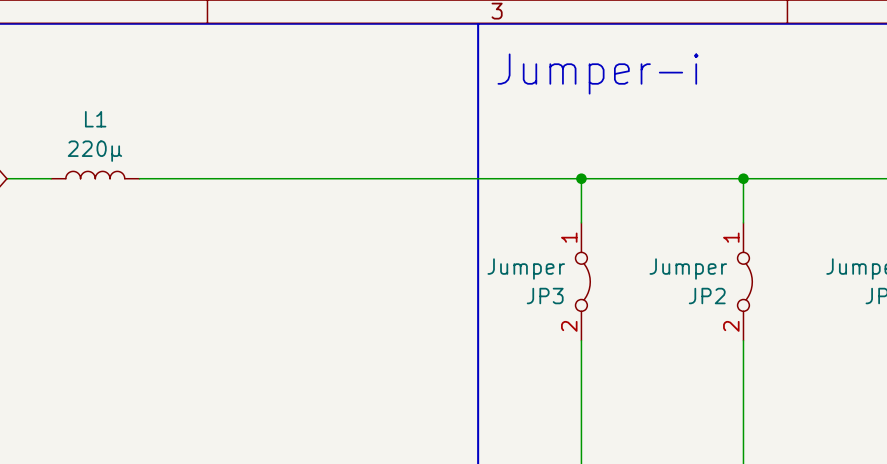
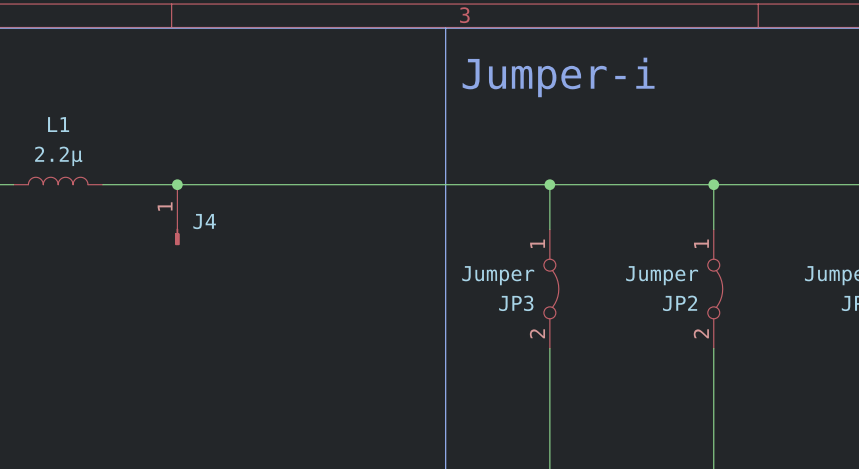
L1 value: 220µ (94, 151) -> 2.2µ (58, 156)
junction: none -> (177, 184)
J4: none -> (177, 214)

